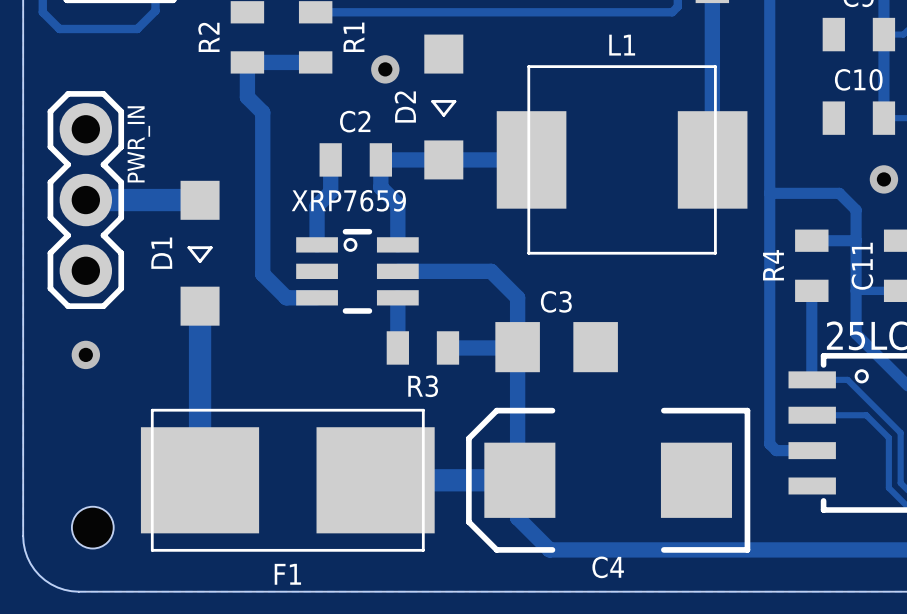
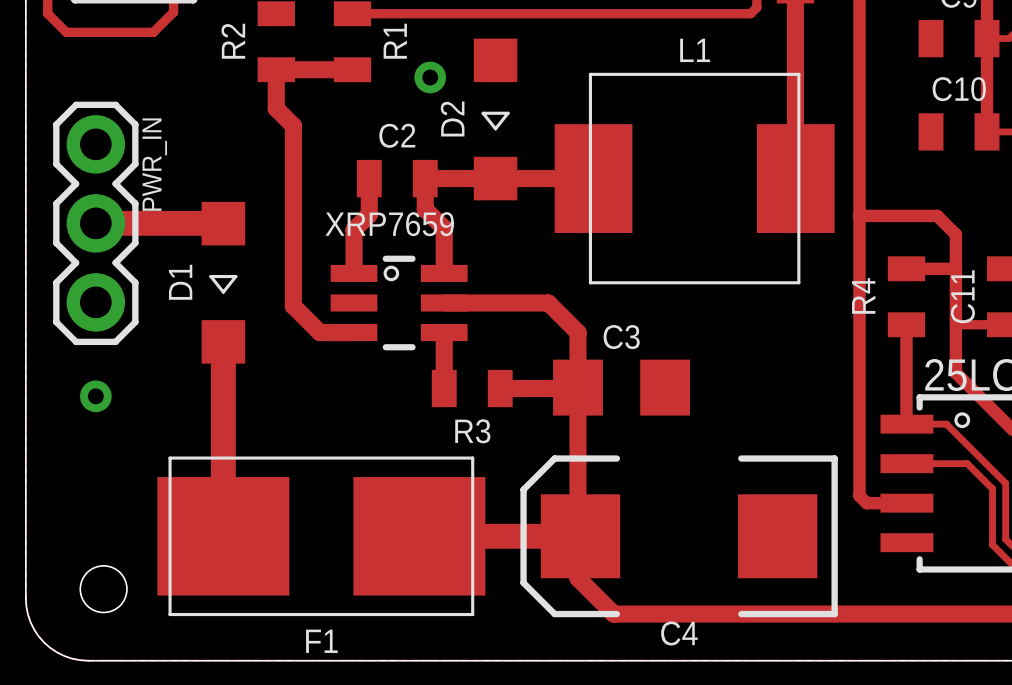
via: (883, 179) -> none

